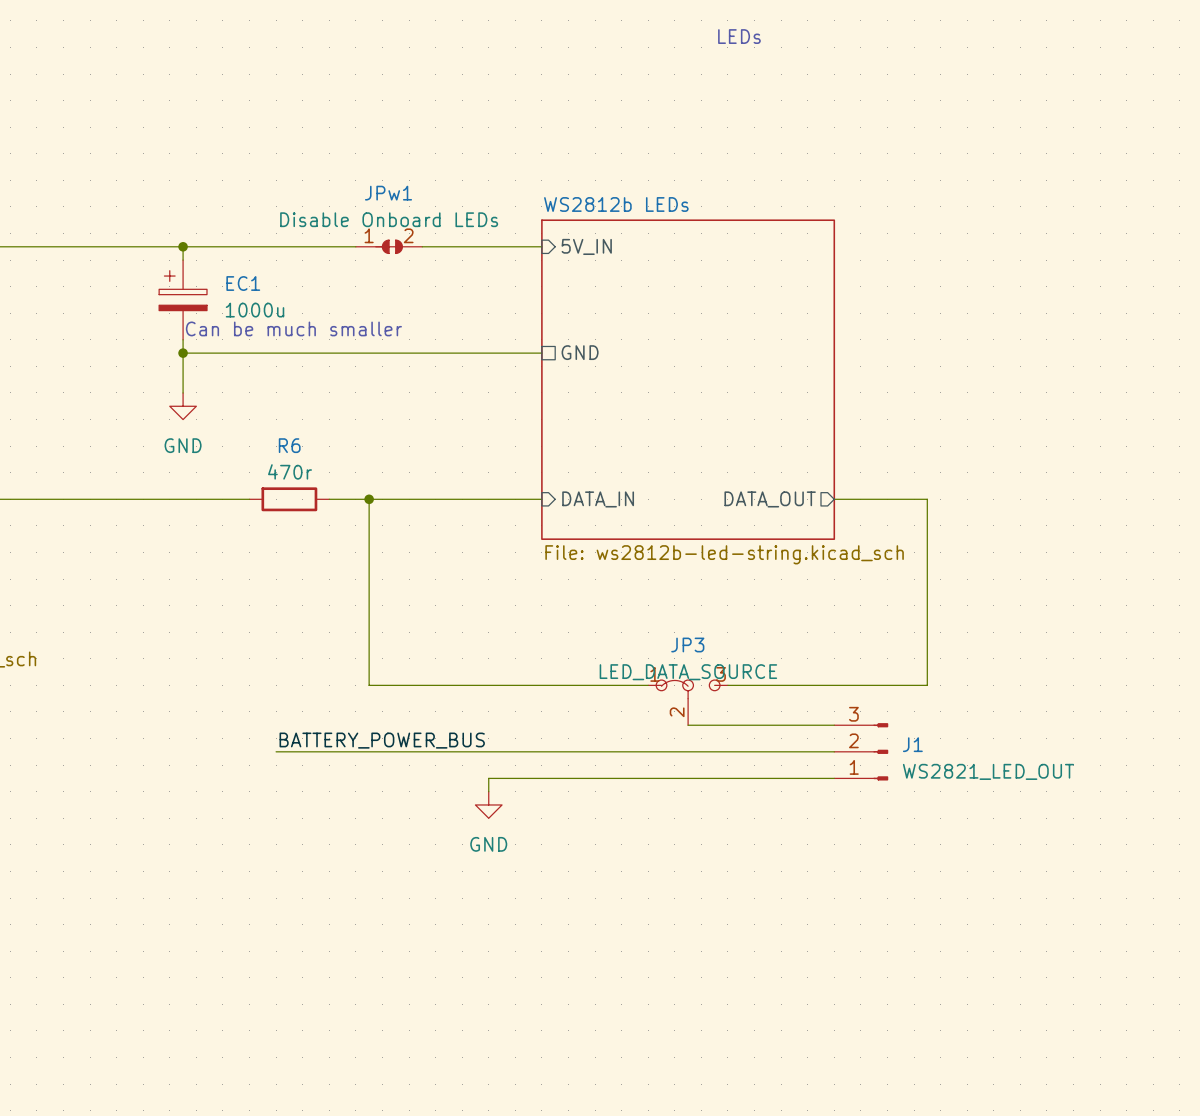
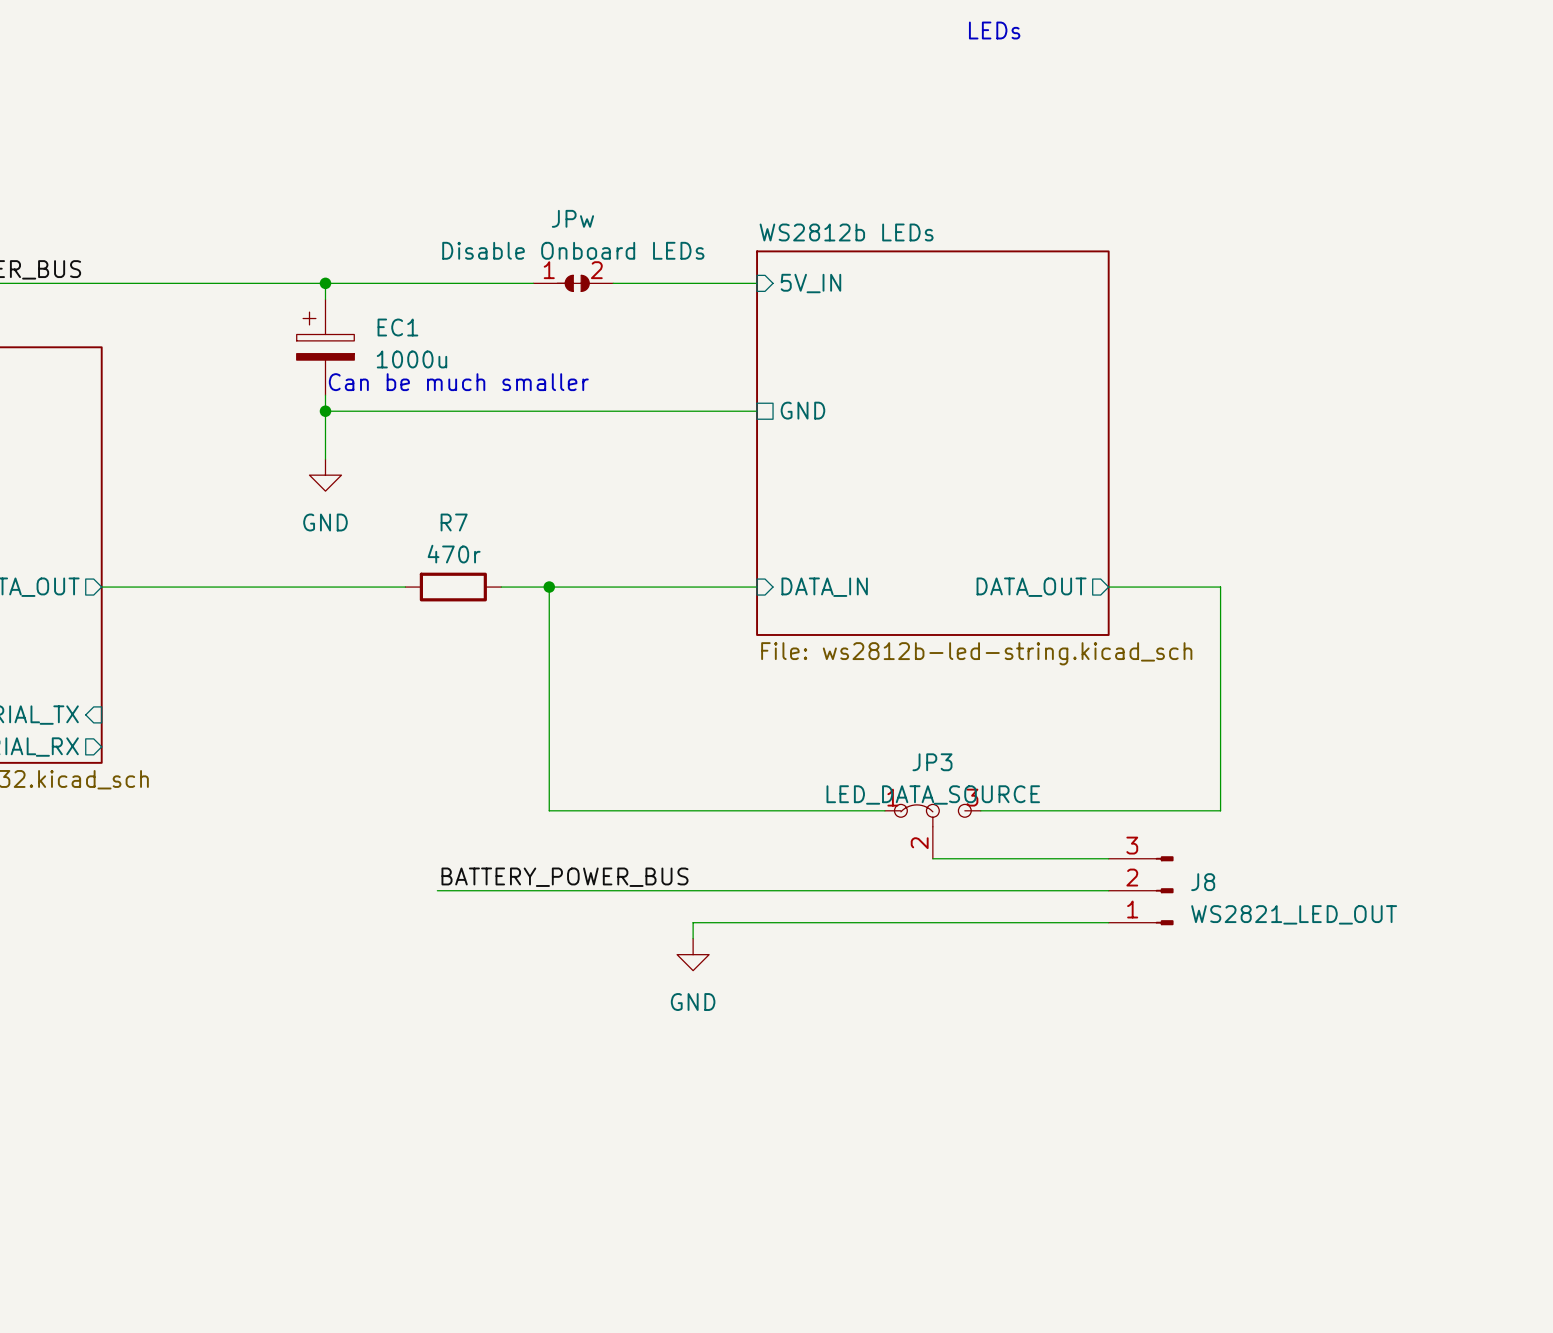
JPw1 name: JPw1 (388, 193) -> JPw (572, 218)
R6 name: R6 (289, 445) -> R7 (454, 522)
J1 name: J1 (912, 744) -> J8 (1203, 882)

